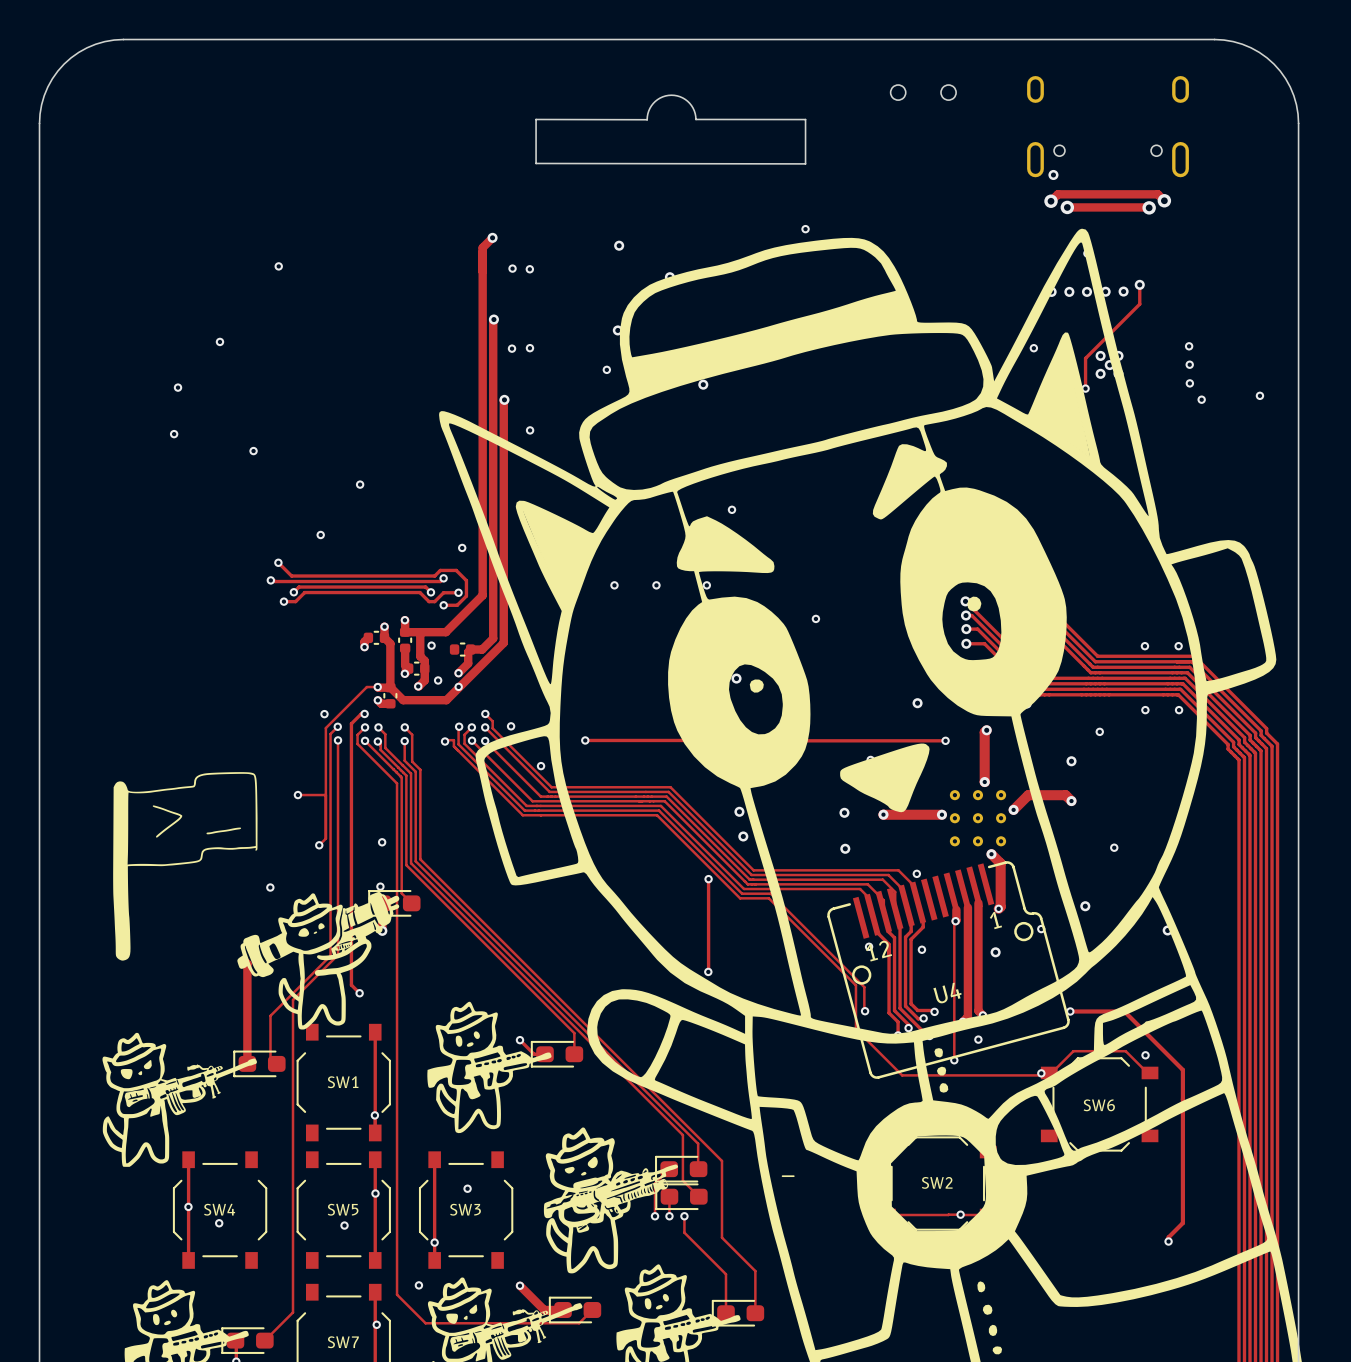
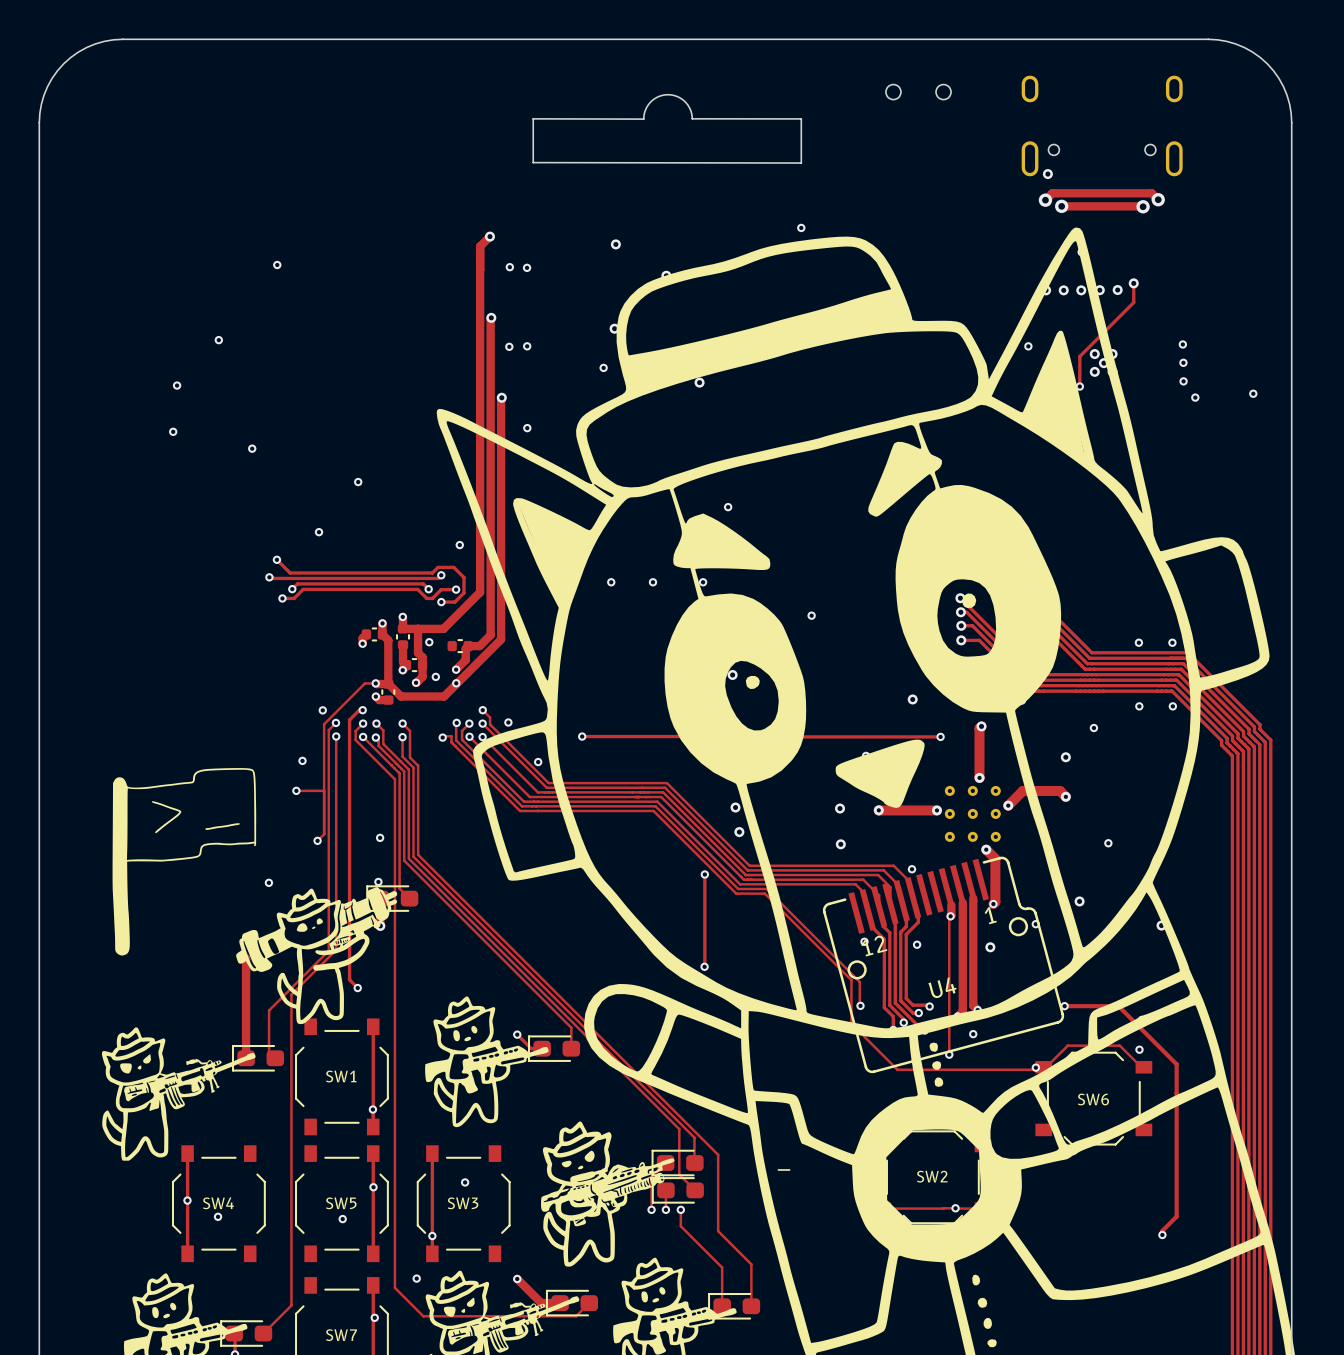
via: none -> (302, 760)

